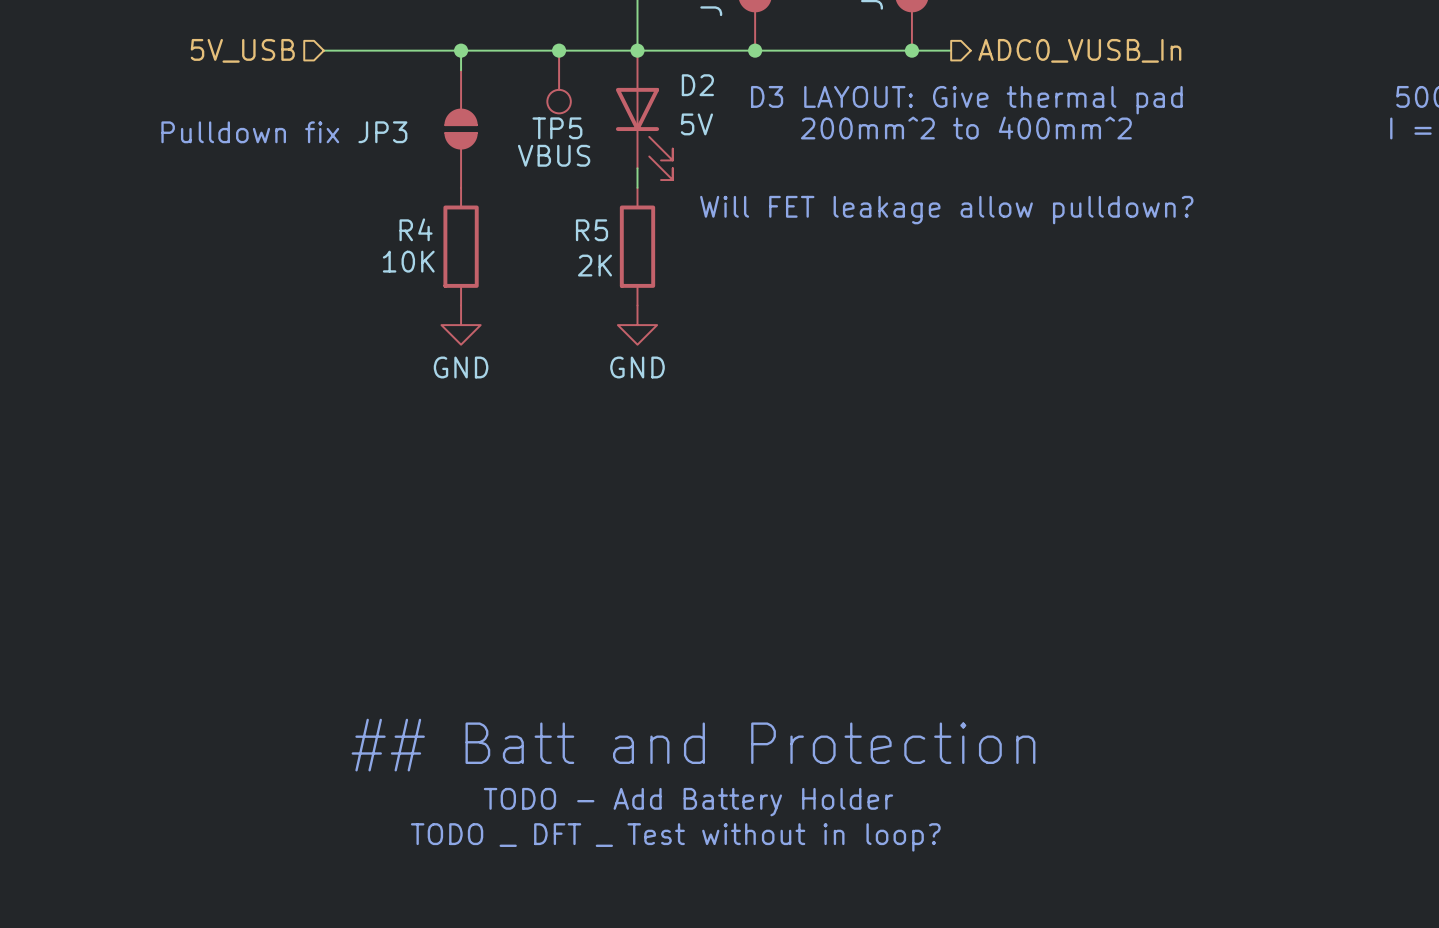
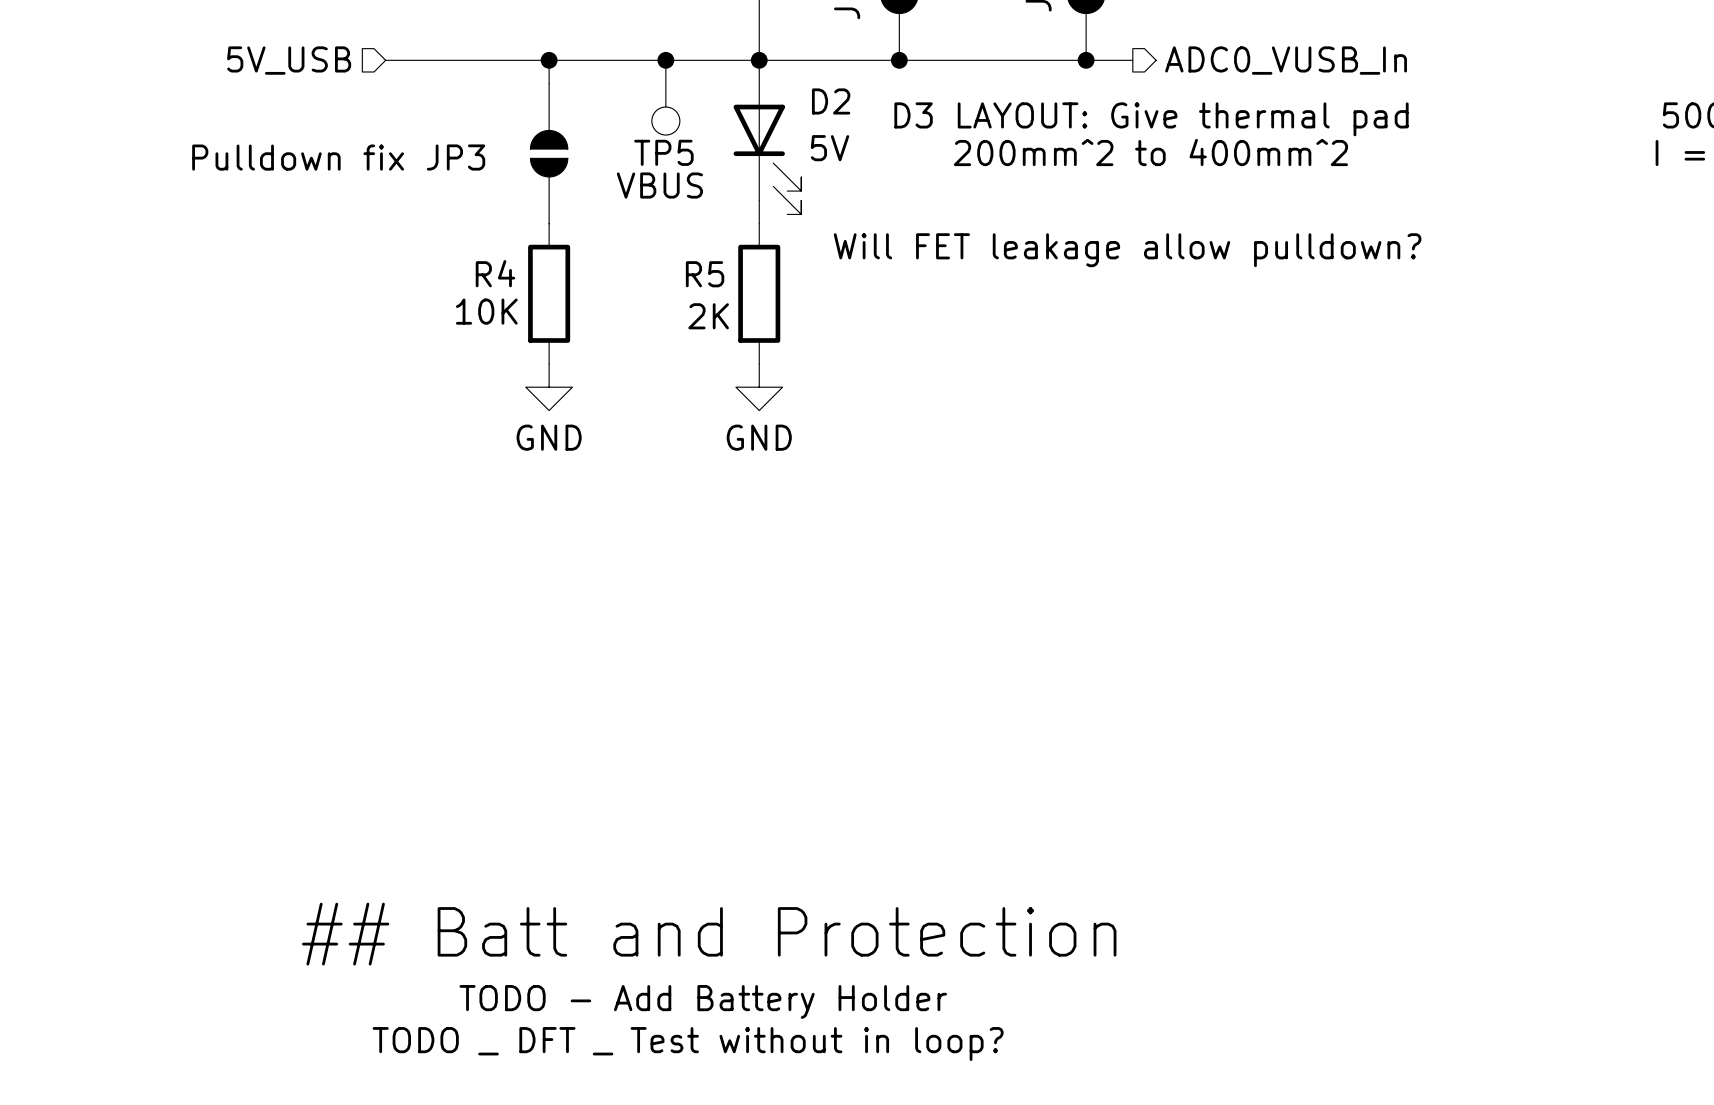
text position: ## Batt and Protection (693, 745) -> ## Batt and Protection (709, 934)
text position: TODO - Add Battery Holder (688, 802) -> TODO - Add Battery Holder (703, 1001)
text position: TODO _ DFT _ Test without in loop? (675, 837) -> TODO _ DFT _ Test without in loop? (688, 1044)

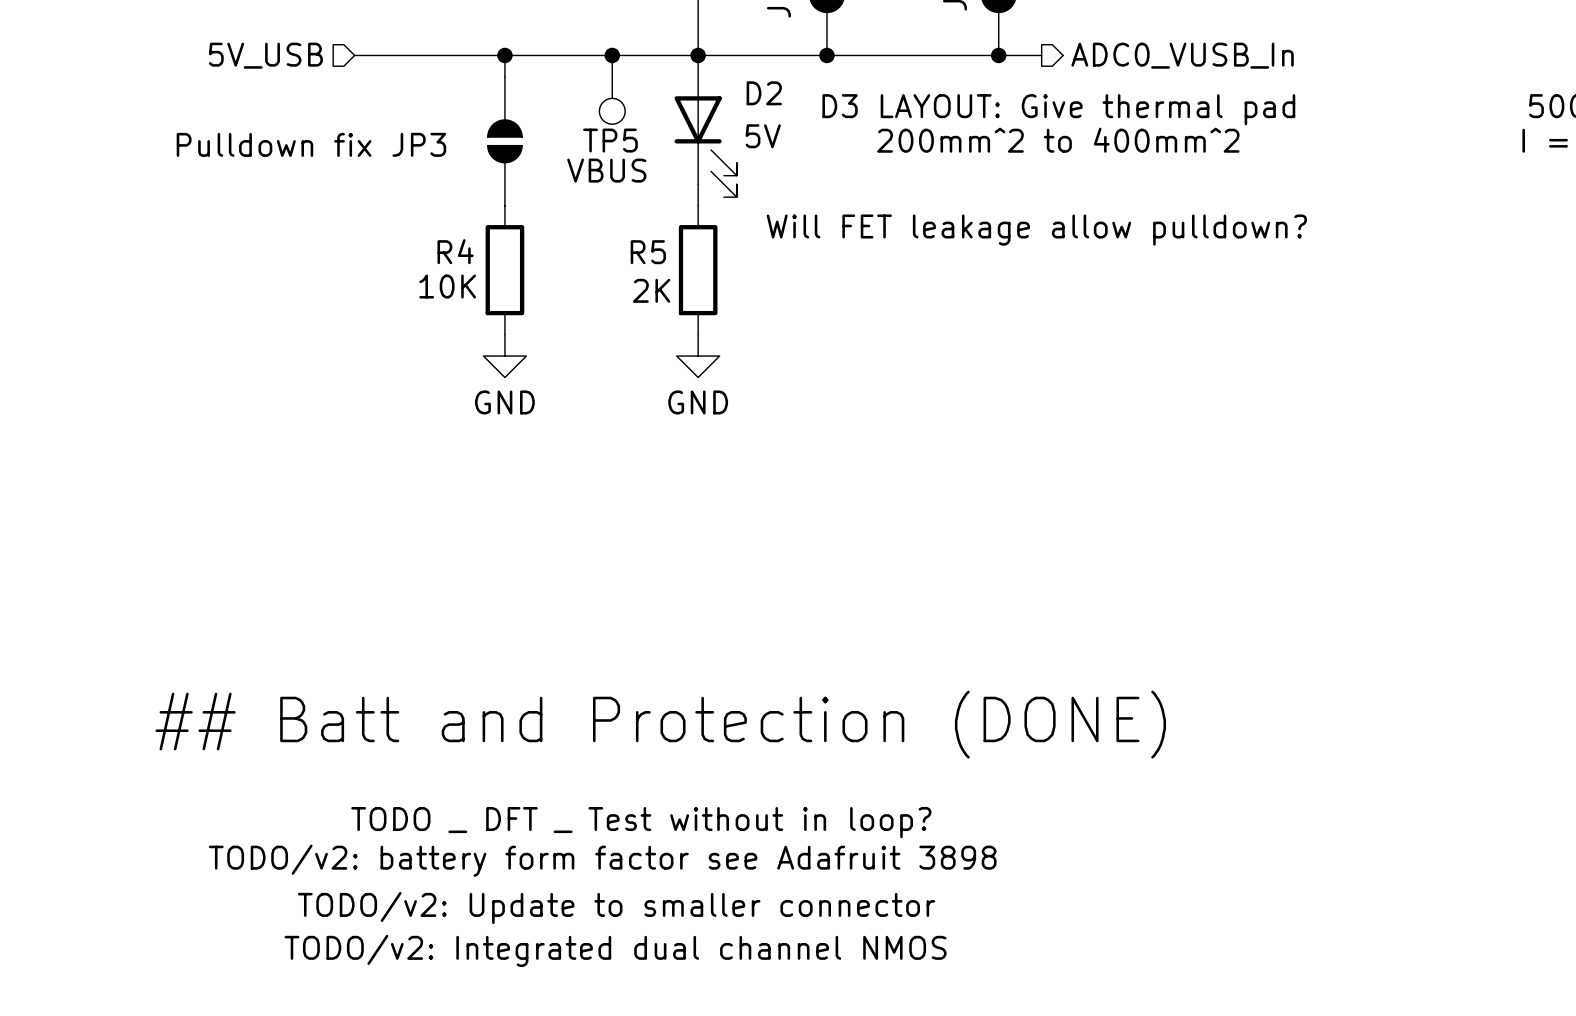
text: none -> ## Batt and Protection (DONE) (660, 724)
text: ## Batt and Protection (709, 934) -> none
text: none -> TODO/v2: battery form factor see Adafruit 3898 (602, 860)
text: none -> TODO/v2: Update to smaller connector (616, 907)
text: TODO - Add Battery Holder (703, 1001) -> none
text: none -> TODO/v2: Integrated dual channel NMOS (615, 950)
text position: TODO _ DFT _ Test without in loop? (688, 1044) -> TODO _ DFT _ Test without in loop? (641, 822)

